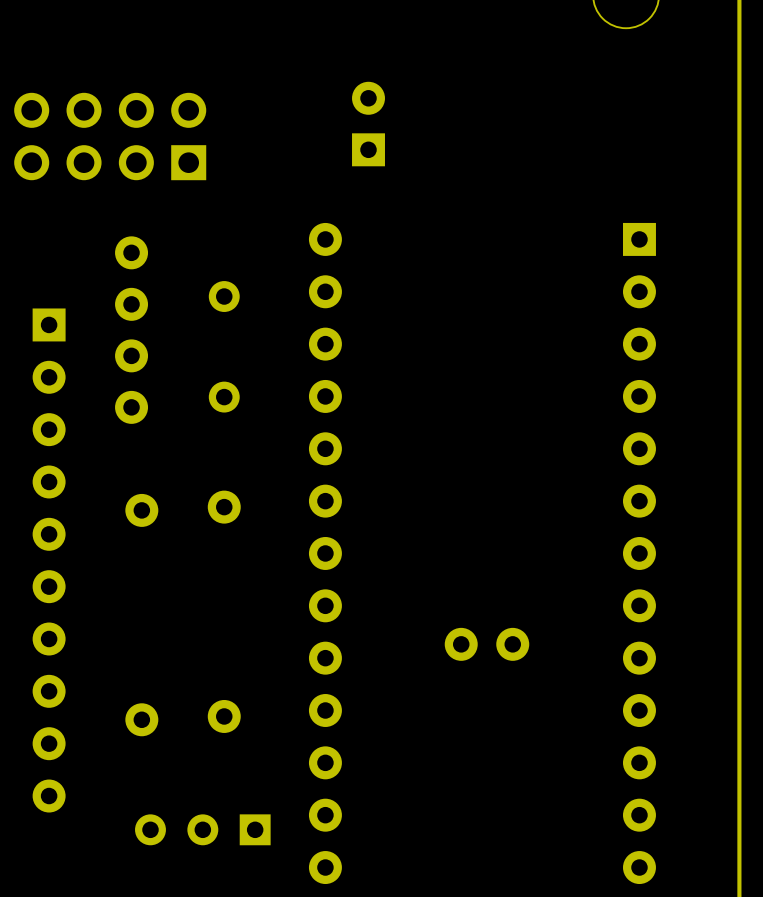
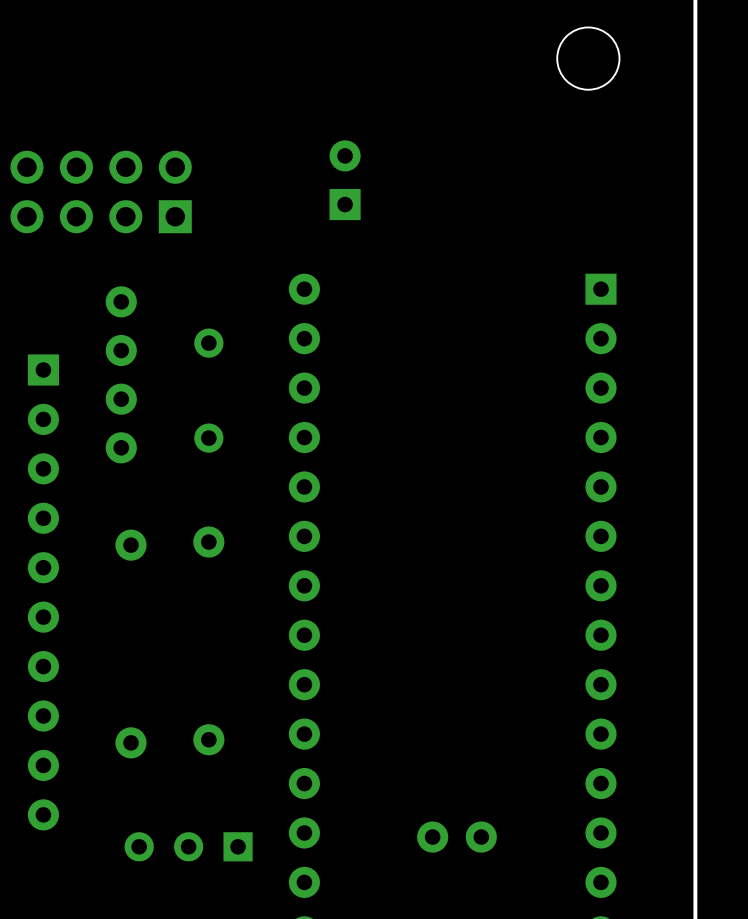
part position: (486, 644) -> (456, 837)

